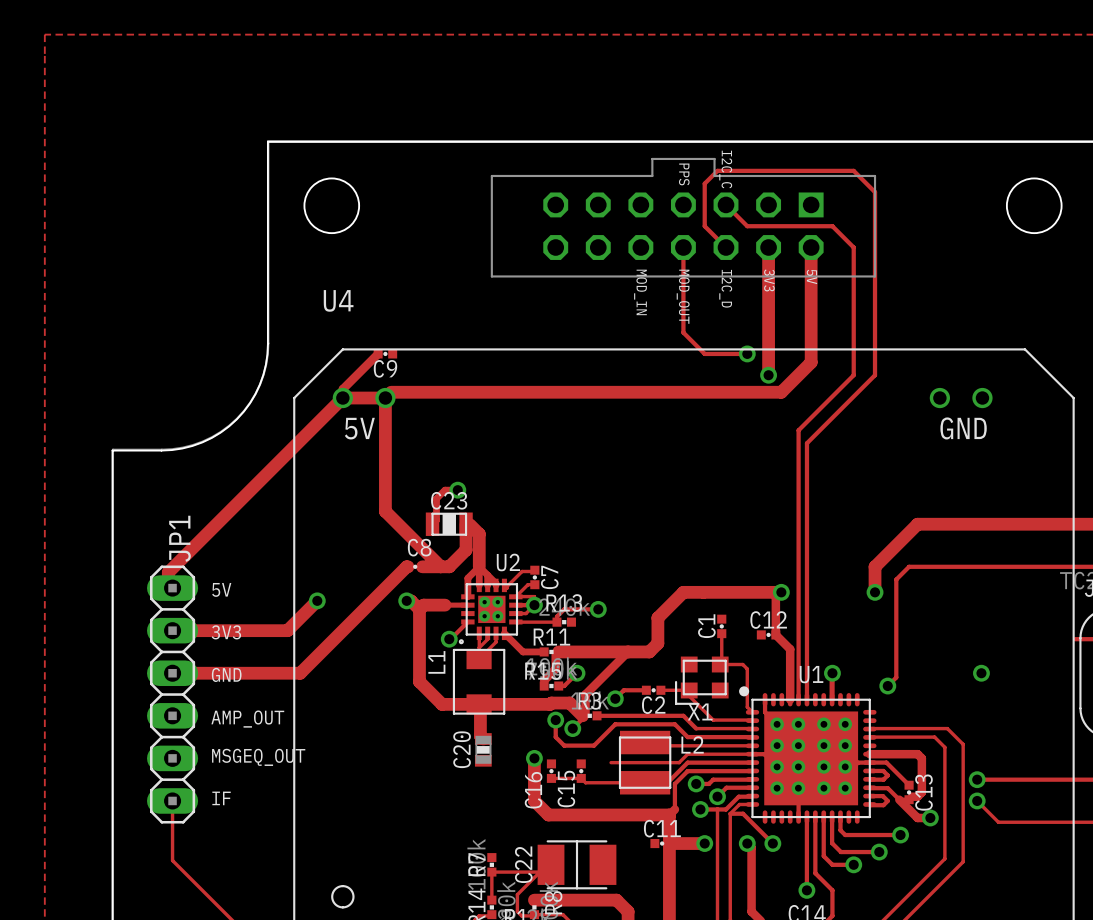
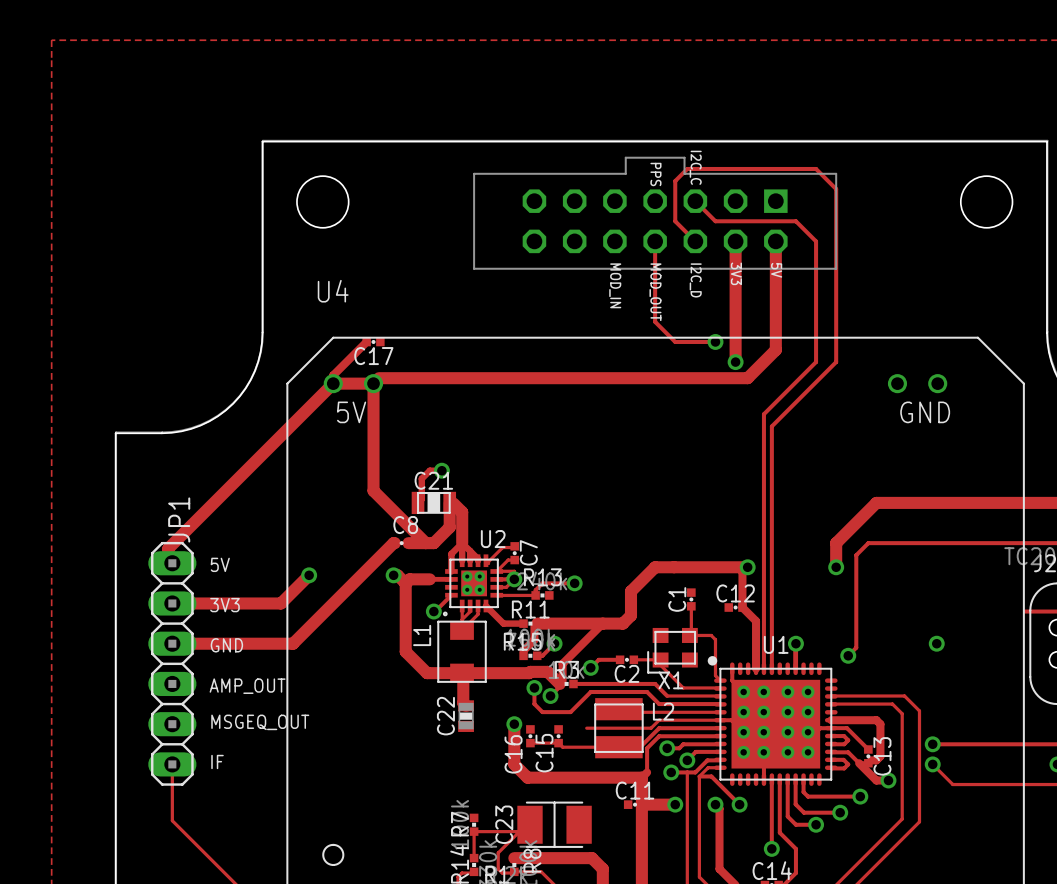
C9 name: C9 (385, 368) -> C17 (373, 356)
C23 name: C23 (449, 500) -> C21 (433, 480)
C20 name: C20 (462, 749) -> C22 (445, 716)
C22 name: C22 (523, 864) -> C23 (504, 824)

